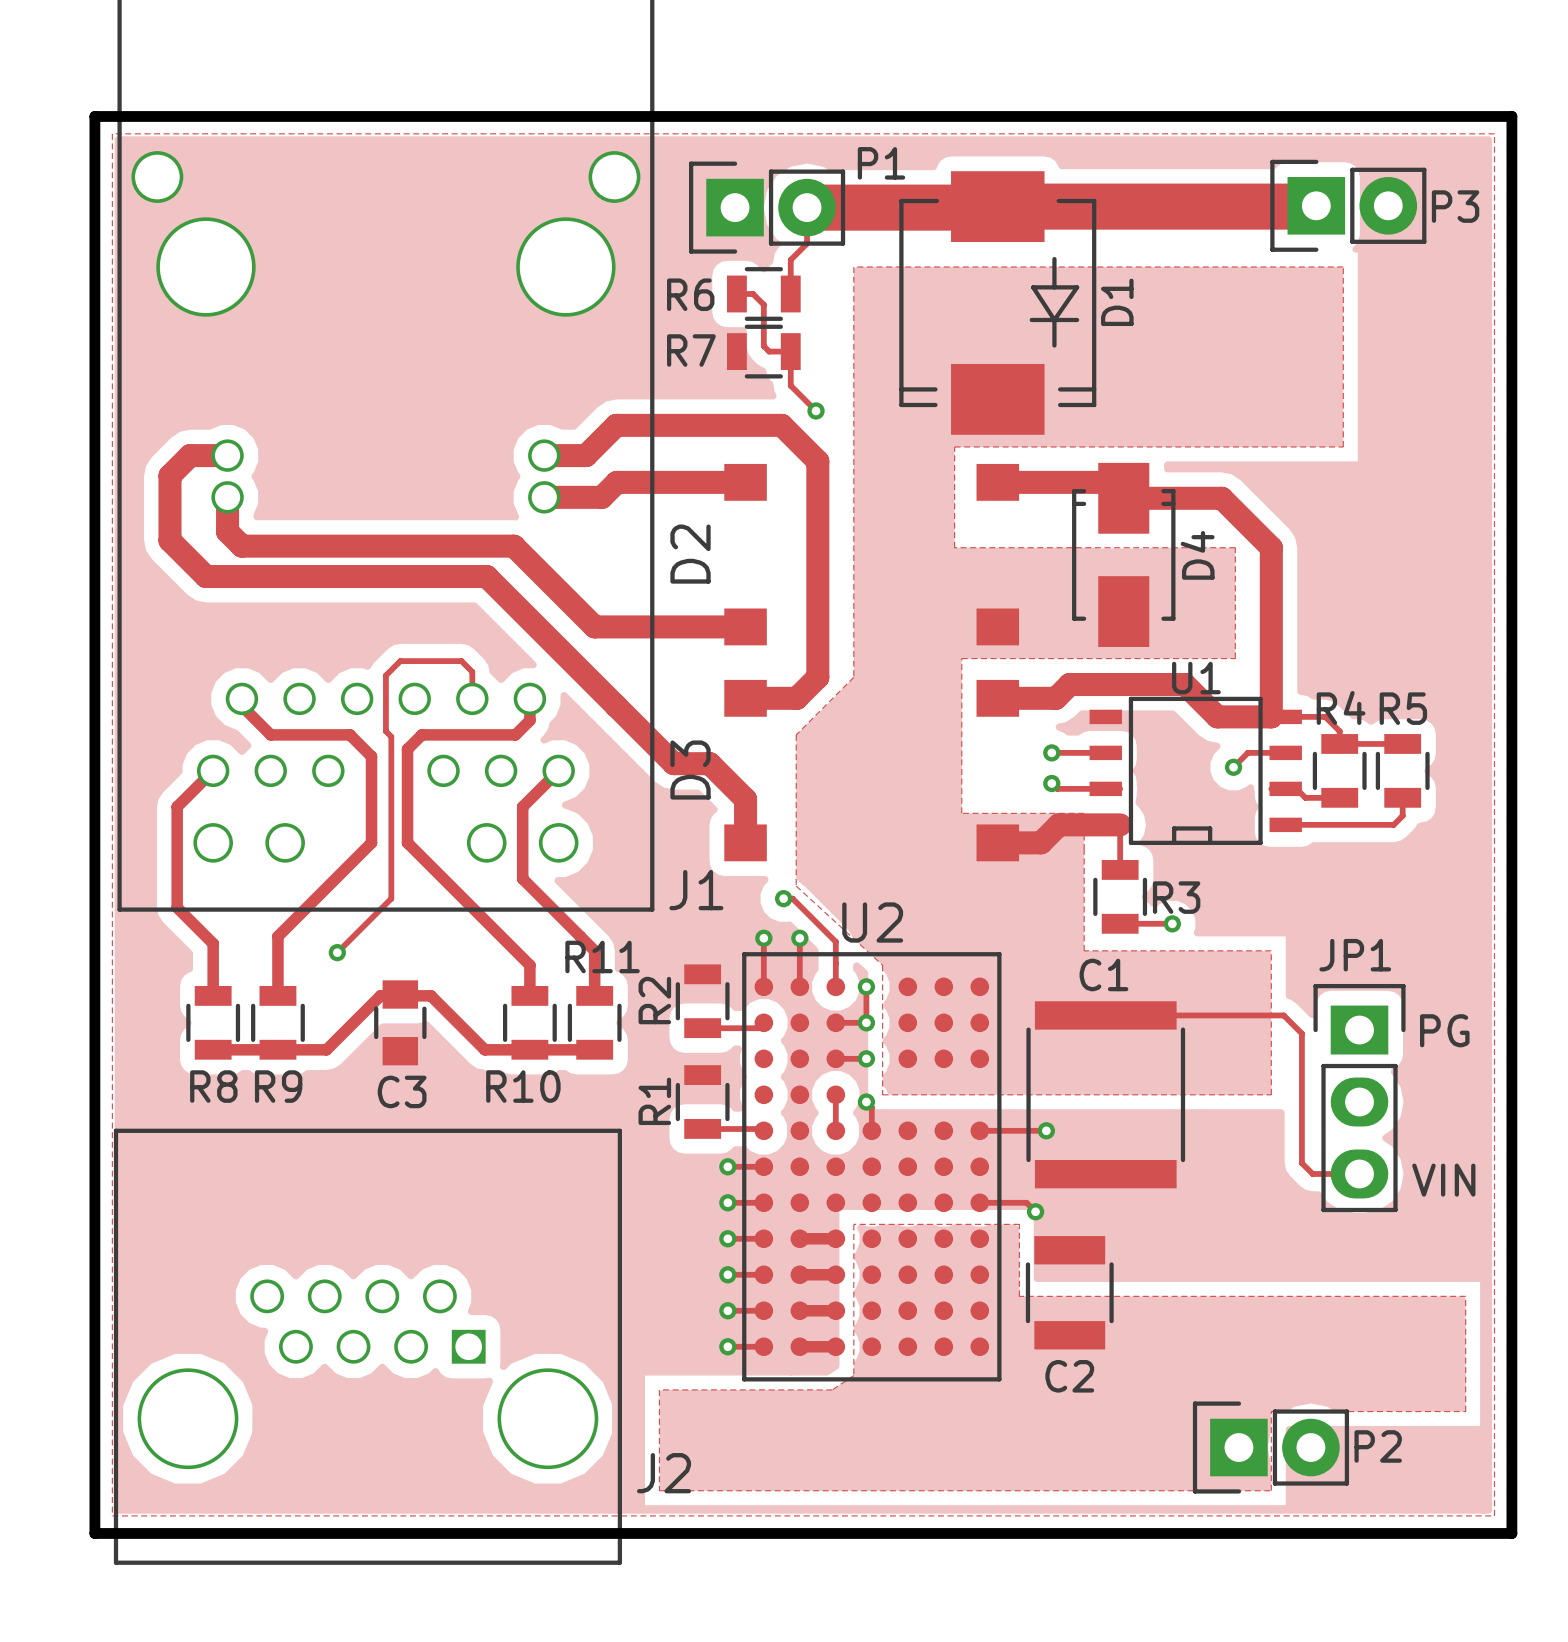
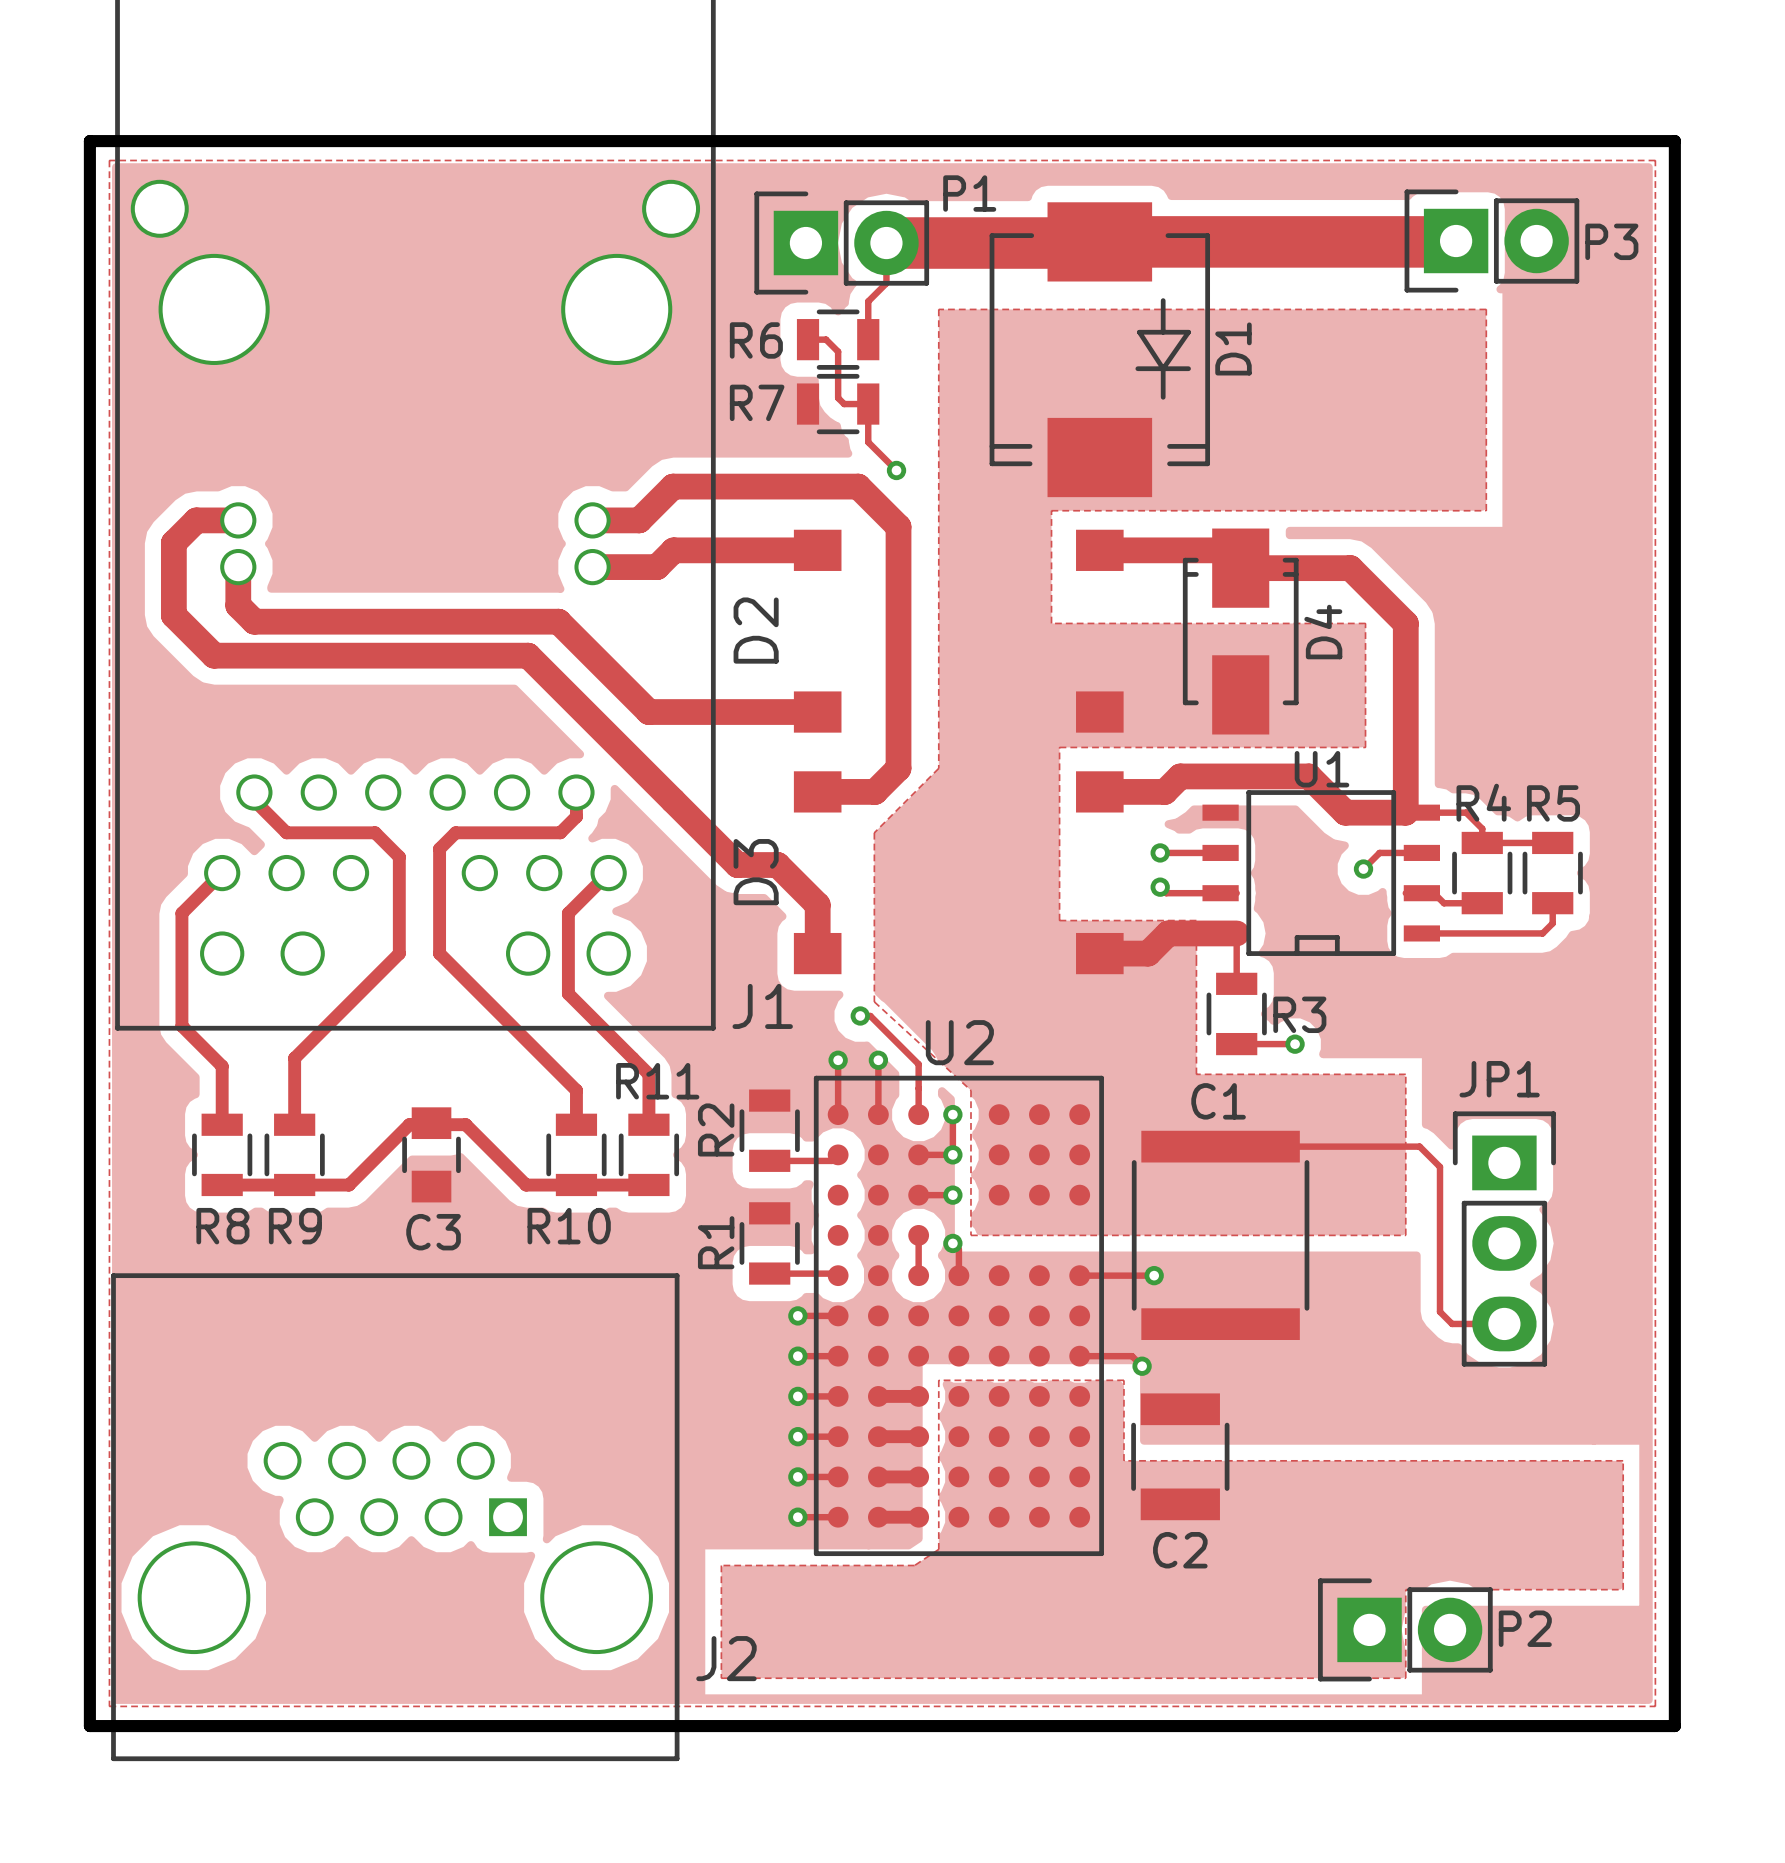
track: (472, 698) (472, 671) (461, 661) (400, 661) (385, 675) (385, 731) (391, 736) (391, 898) (337, 952) -> none
via: (337, 952) -> none
text: PG (1444, 1030) -> none
text: VIN (1443, 1180) -> none

